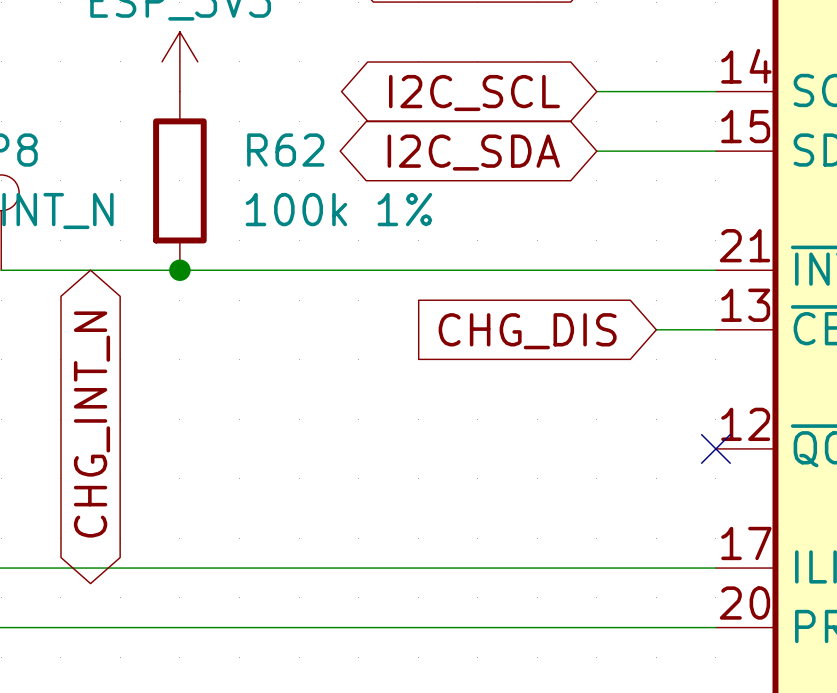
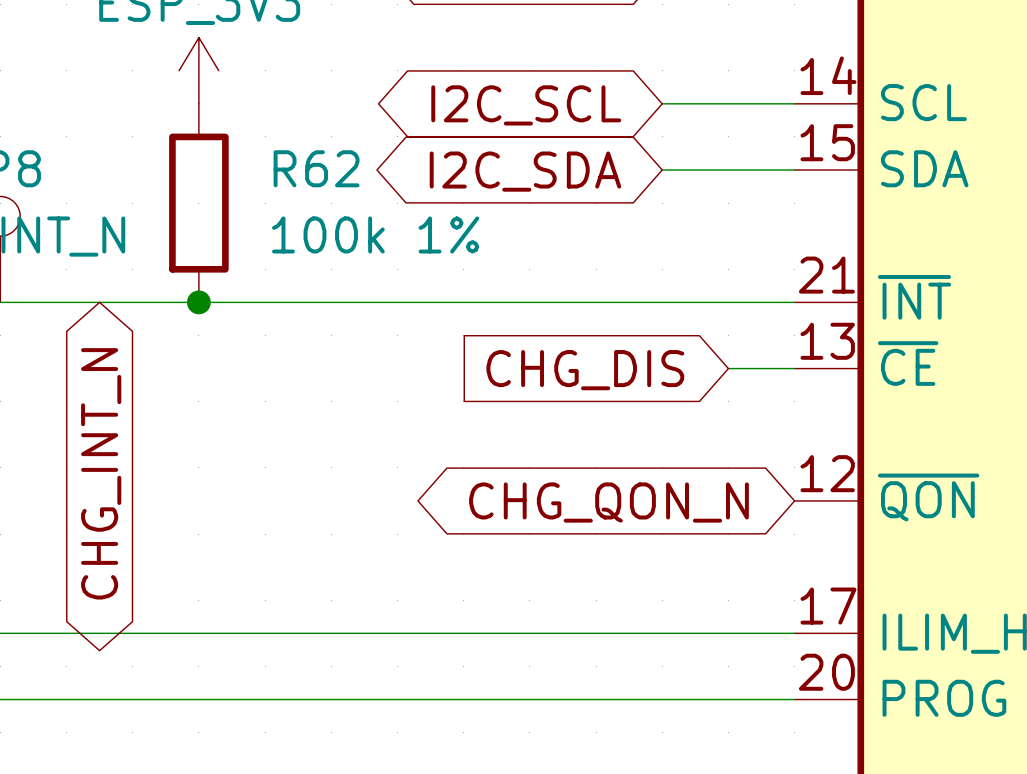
no-connect mark: (715, 448) -> none
global label: none -> CHG_QON_N (608, 502)

